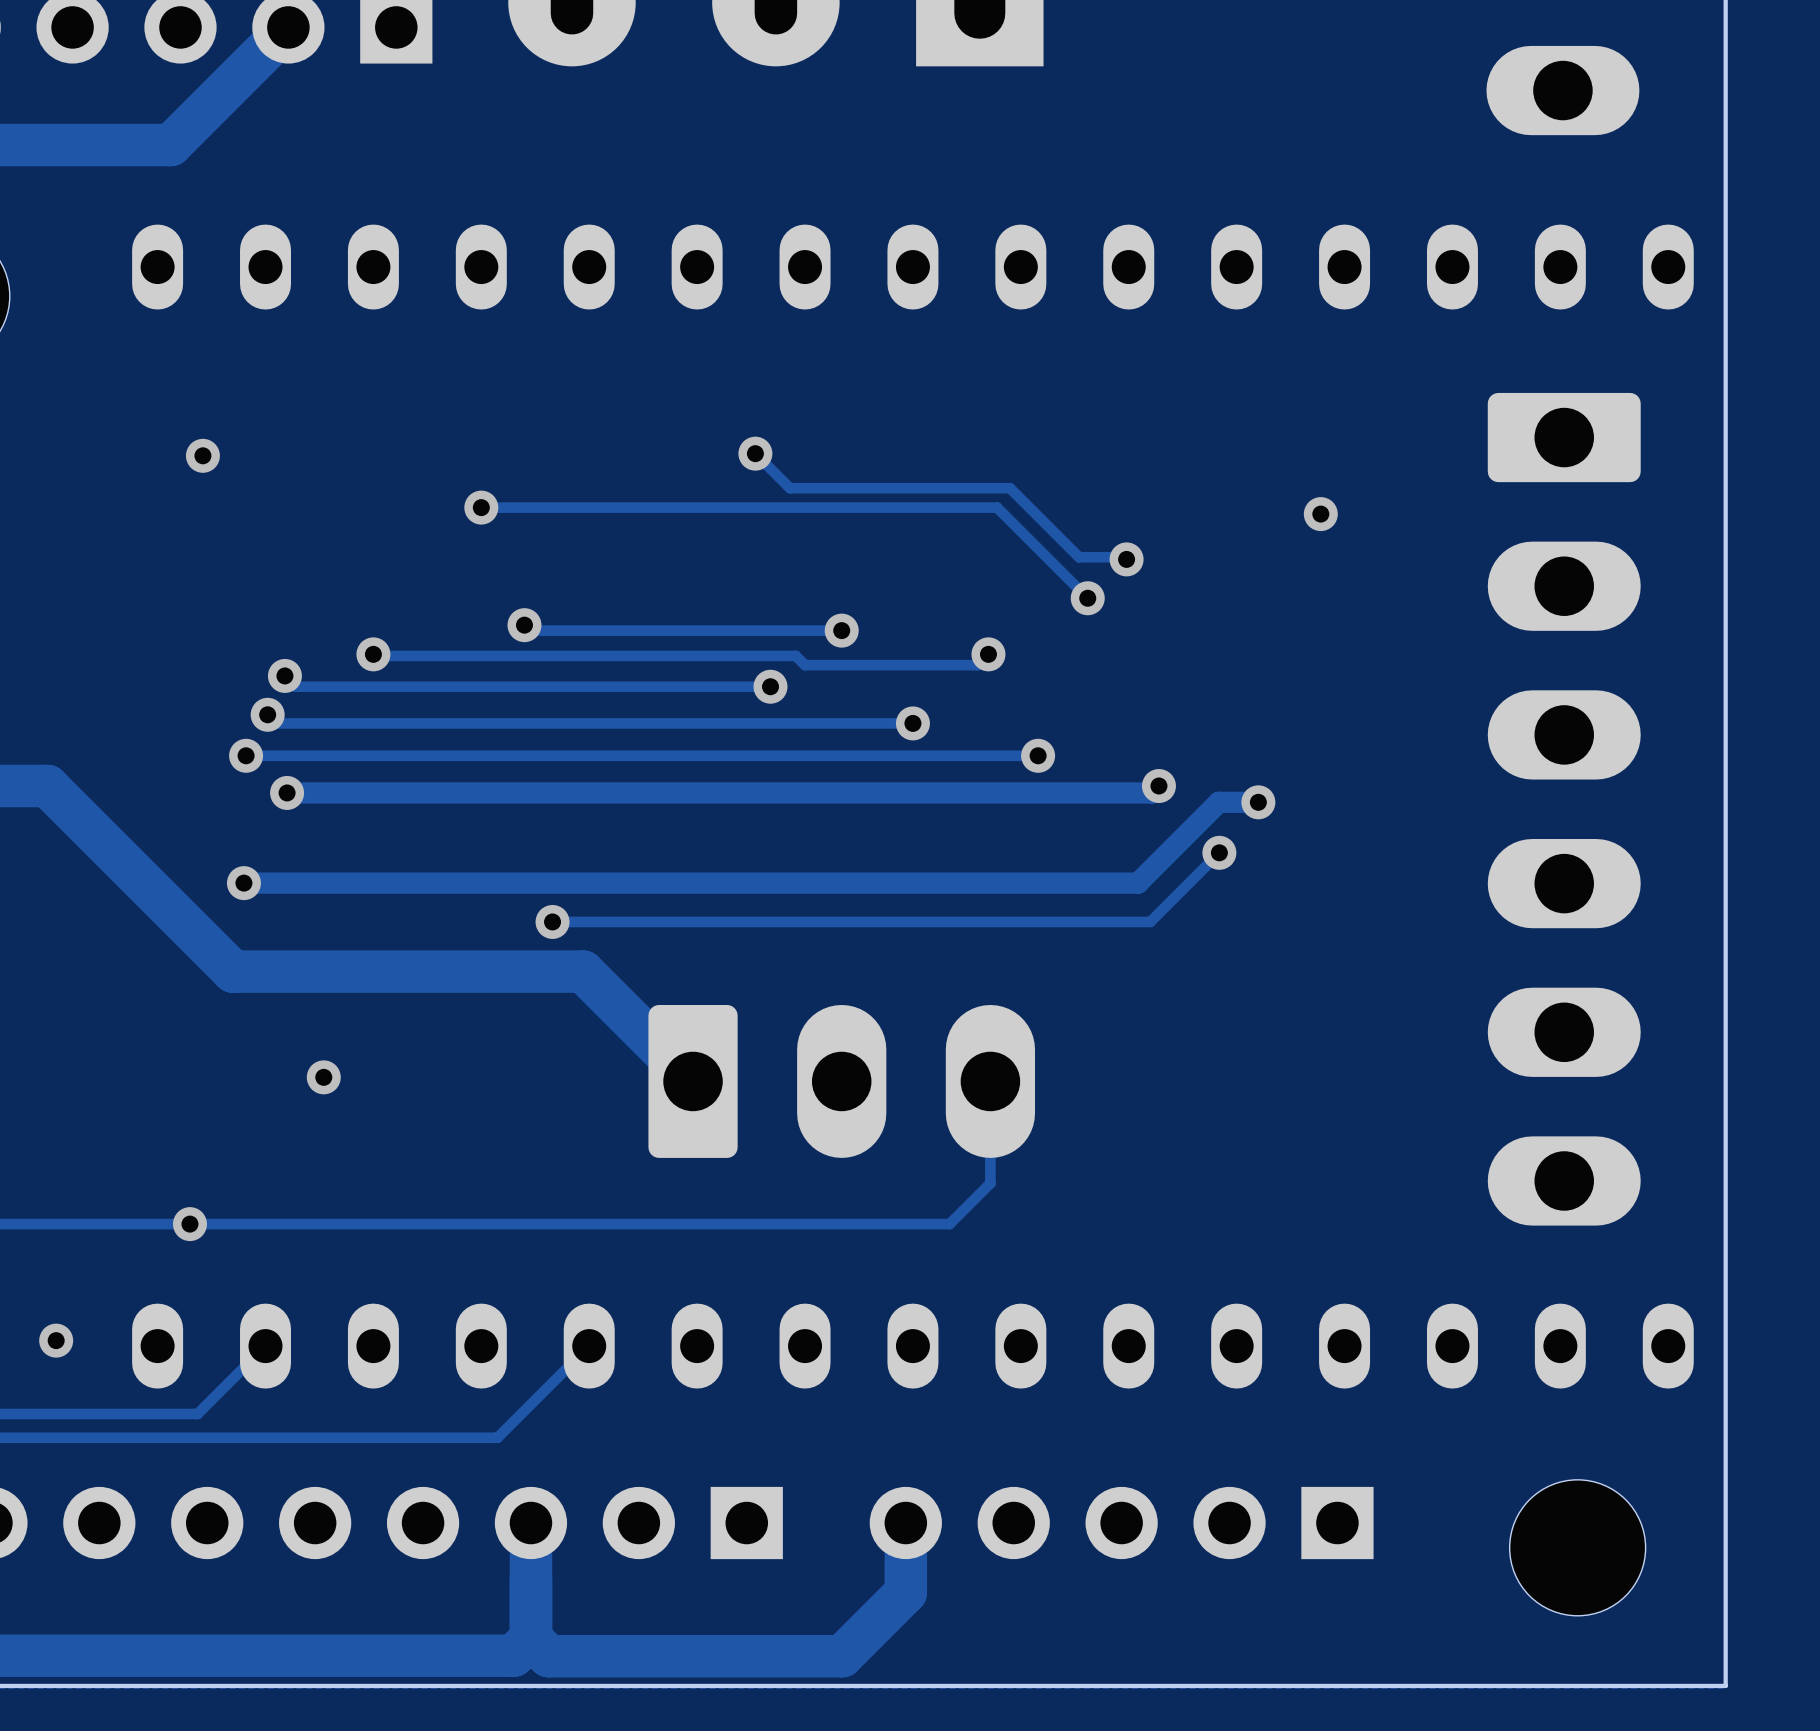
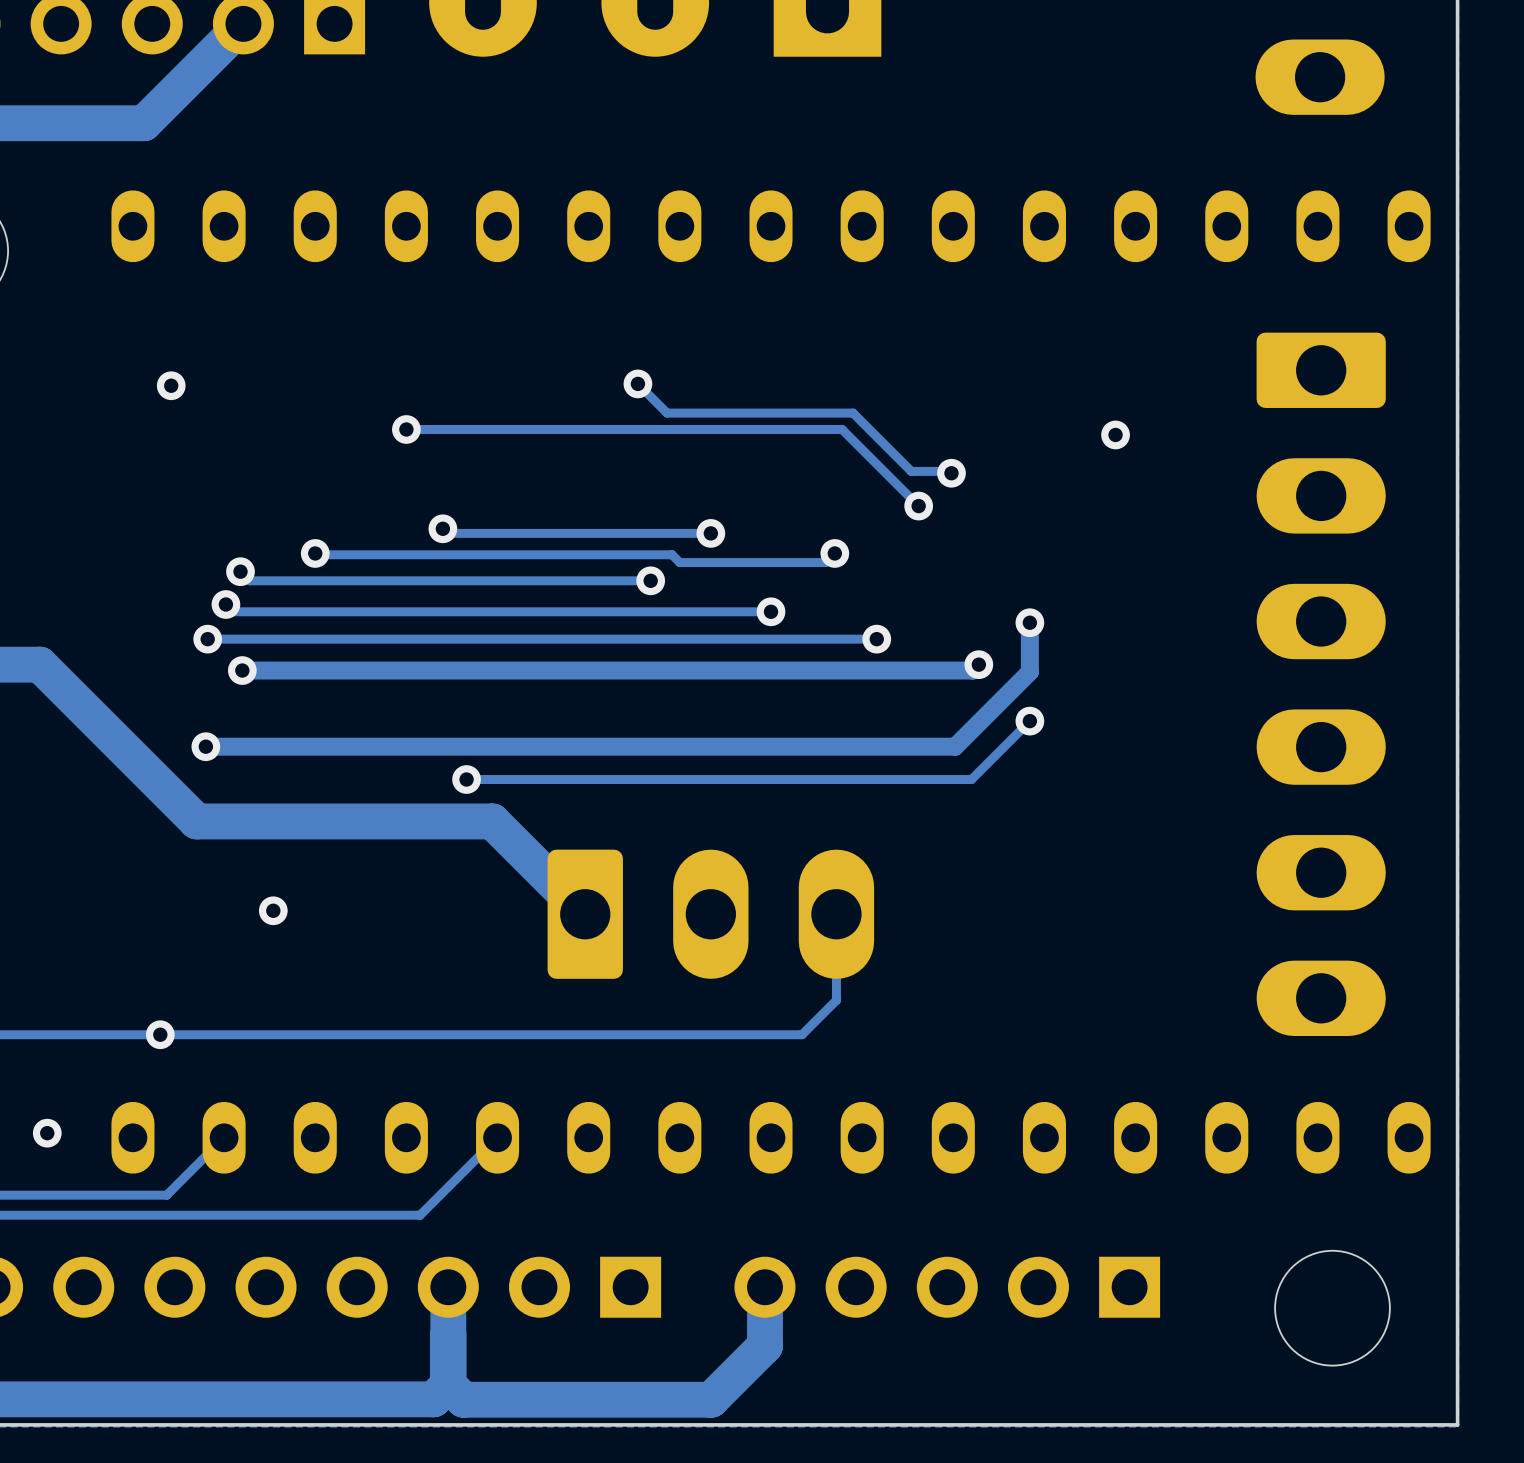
track: (1258, 802) (1218, 802) (1138, 883) (1130, 883) -> (1029, 622) (1029, 671) (955, 746)
via position: (1258, 802) -> (1029, 622)

